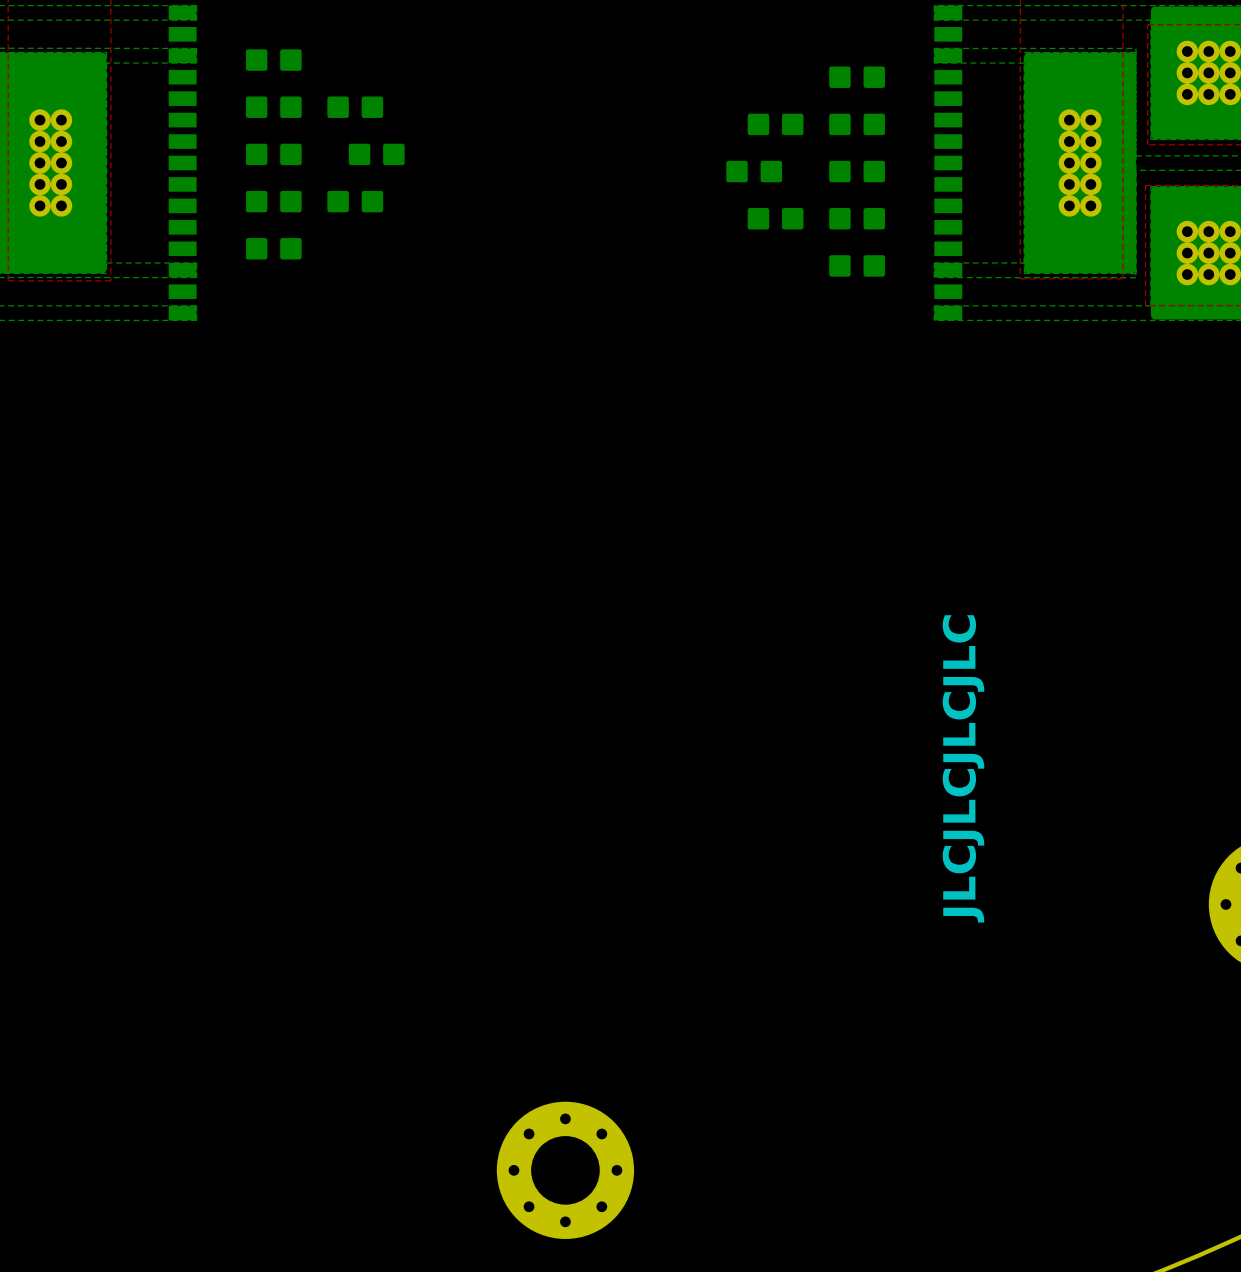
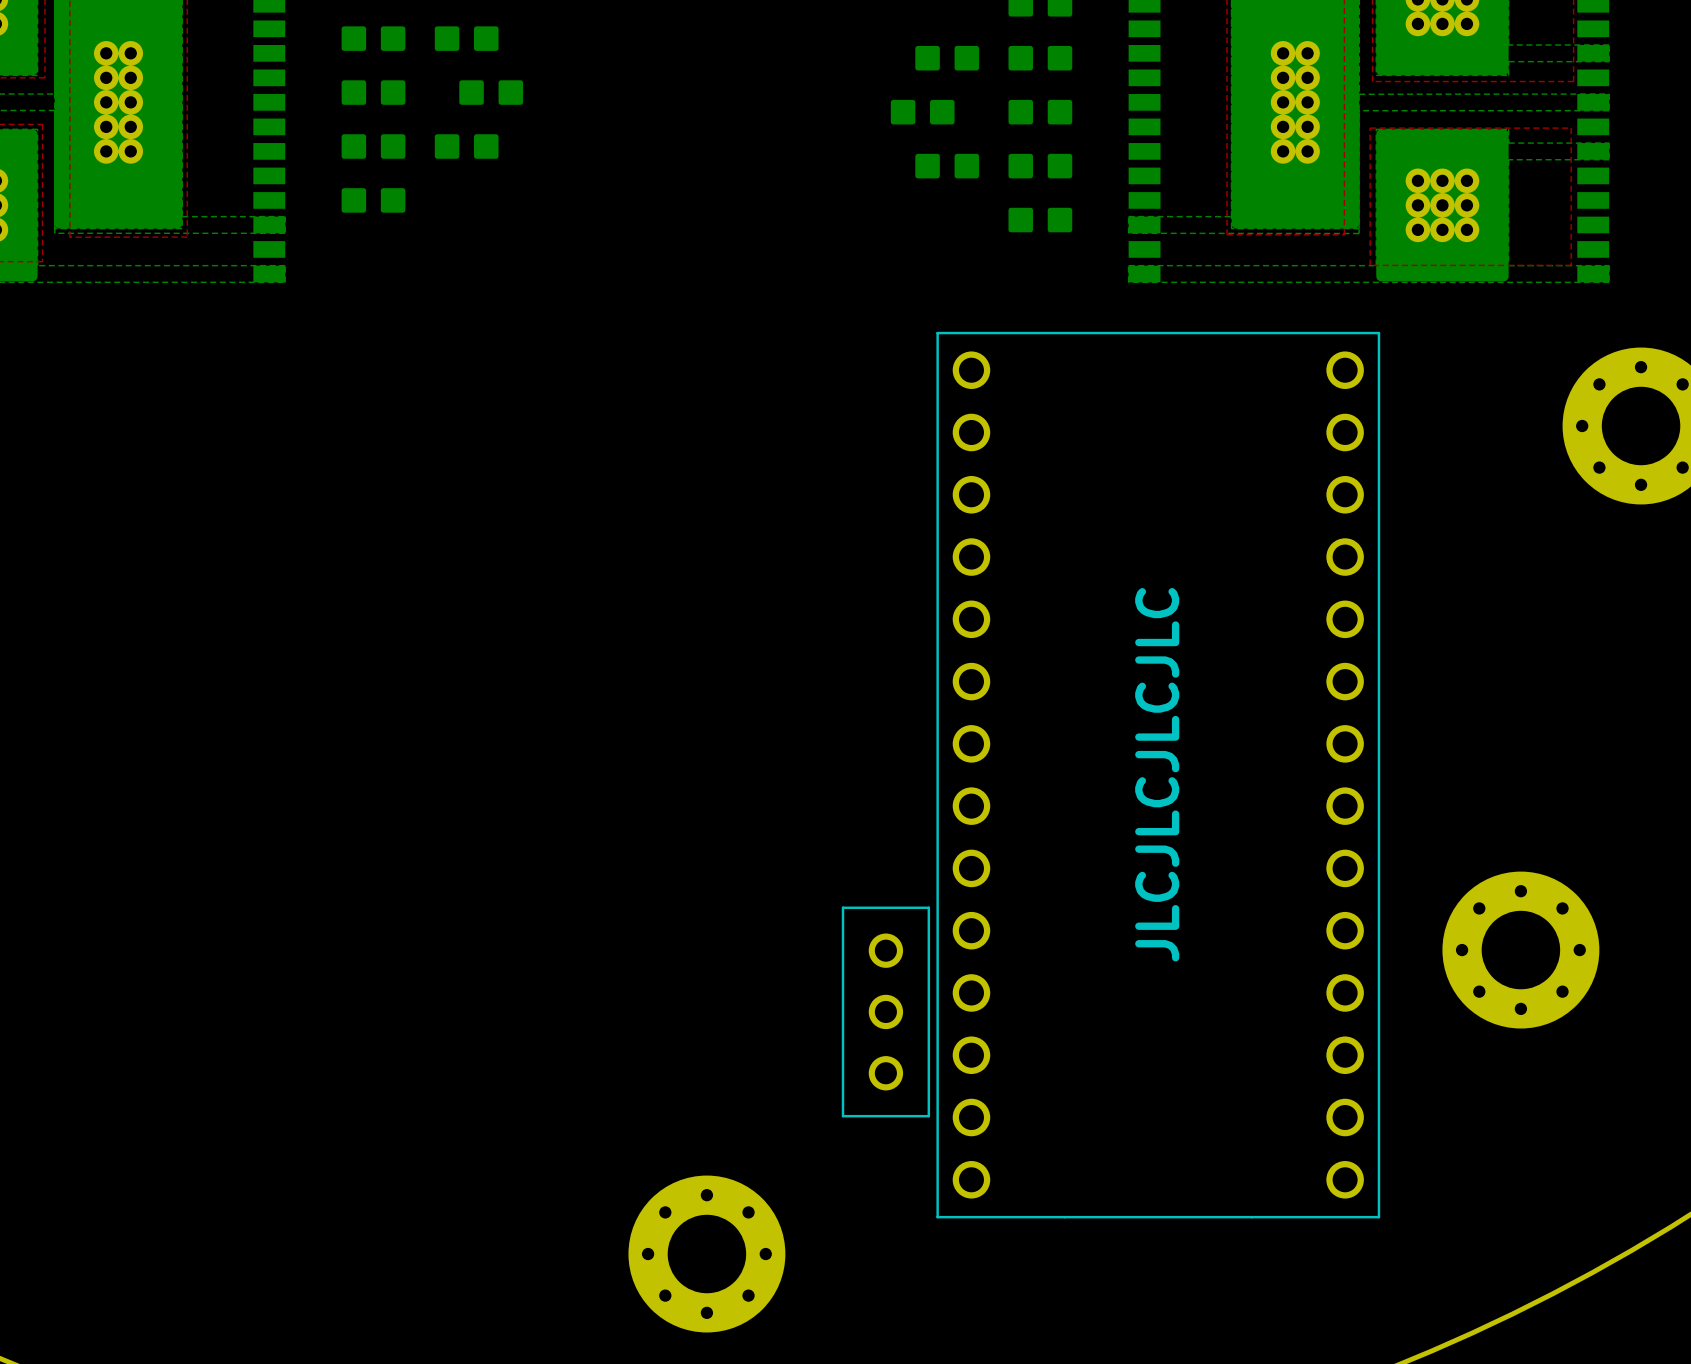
part: none -> (1158, 775)
part: none -> (885, 1011)

